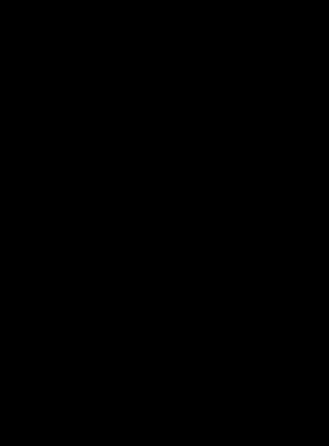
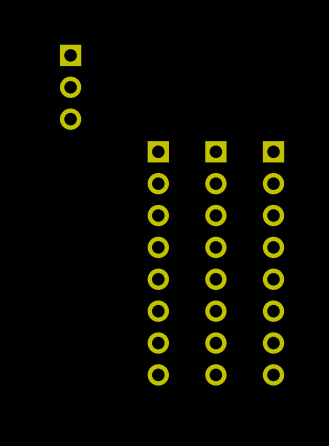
part: none -> (70, 87)
part: none -> (158, 263)
part: none -> (215, 263)
part: none -> (273, 263)

